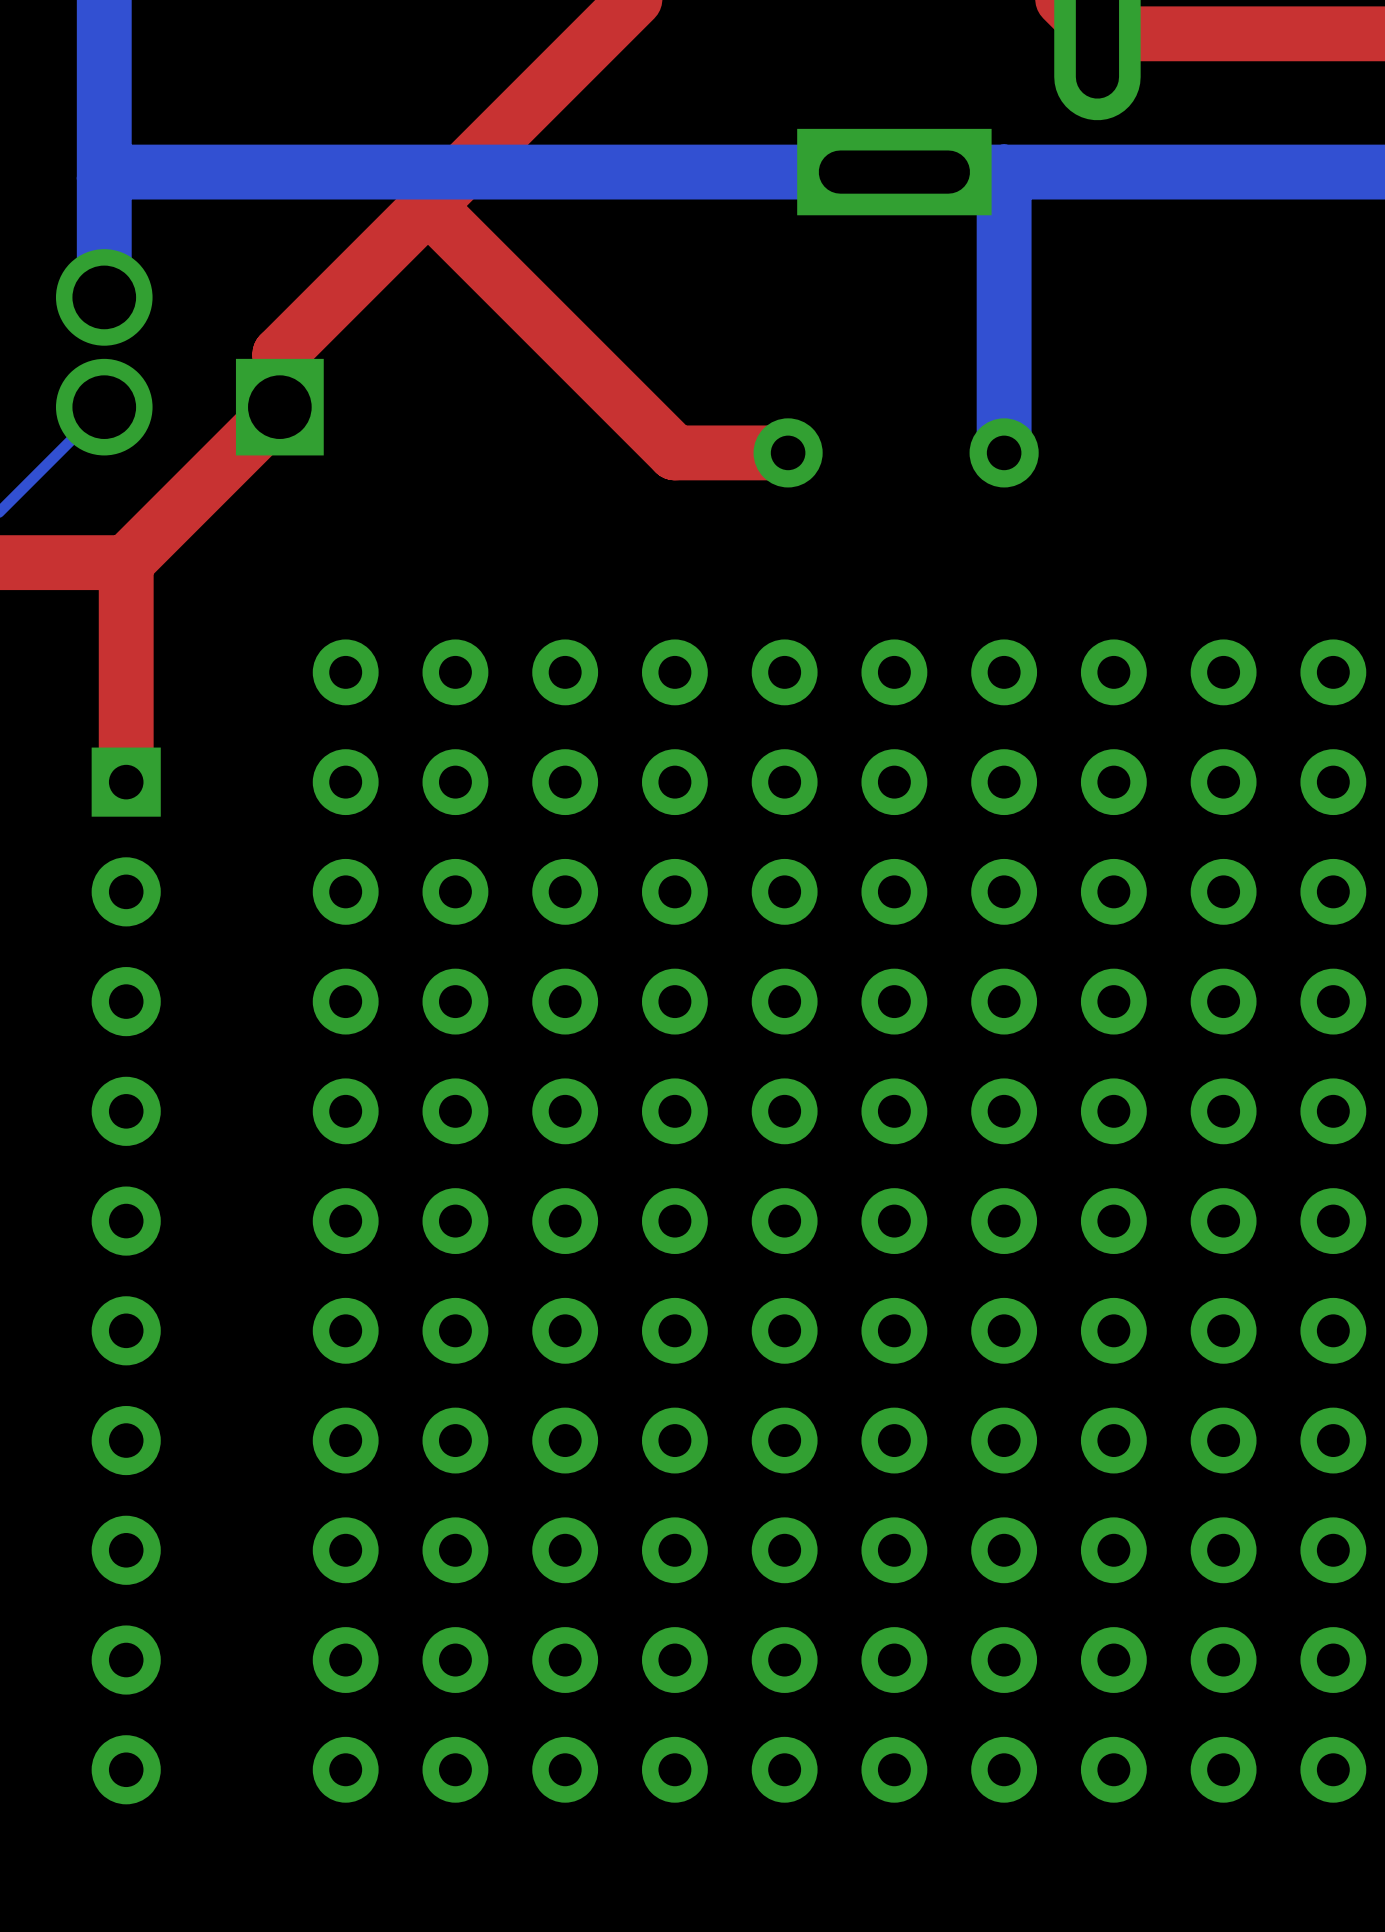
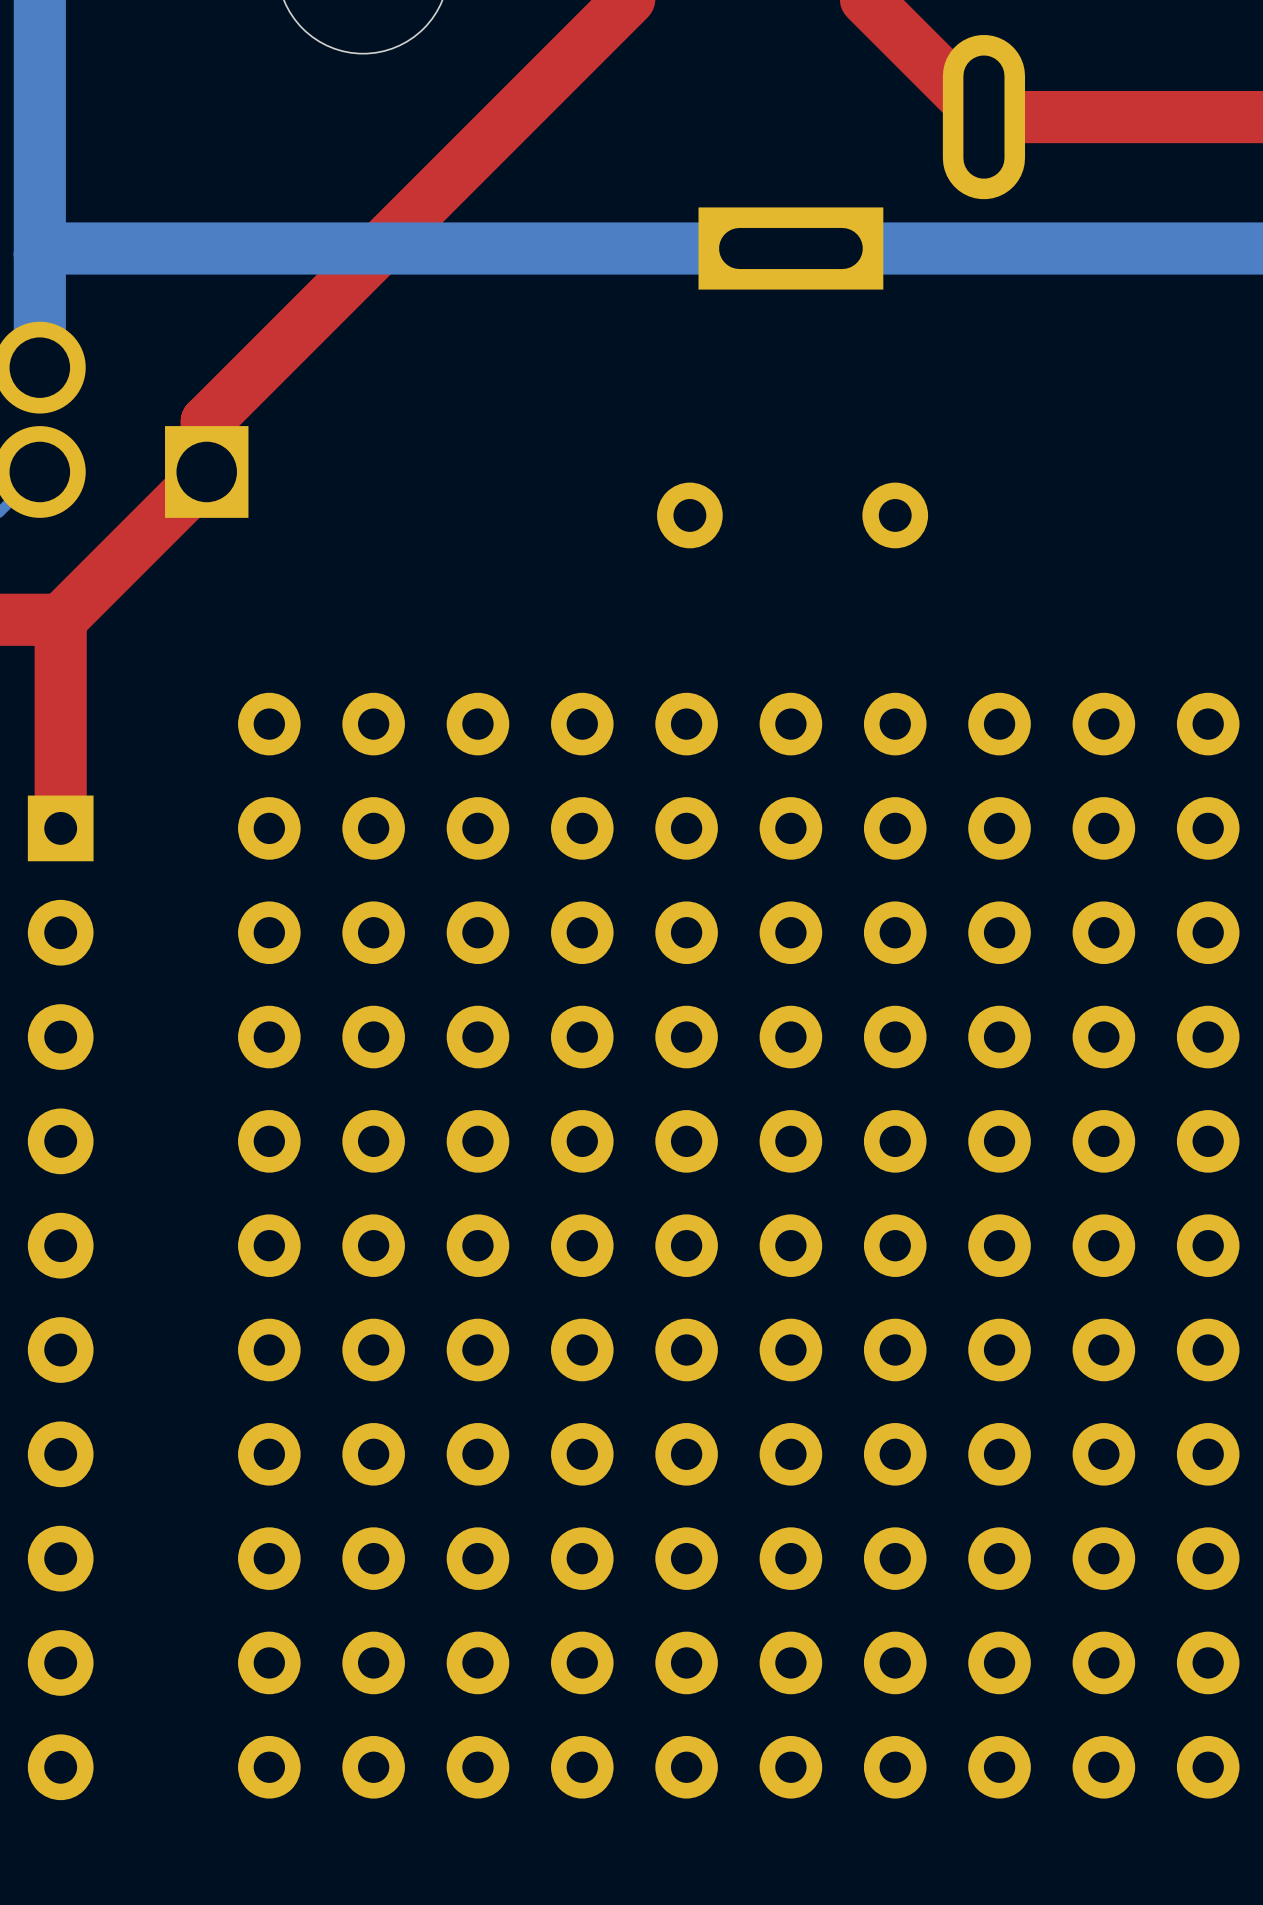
bottom track: (1004, 172) (1004, 452) -> none
top track: (428, 205) (674, 452) (788, 452) -> none

